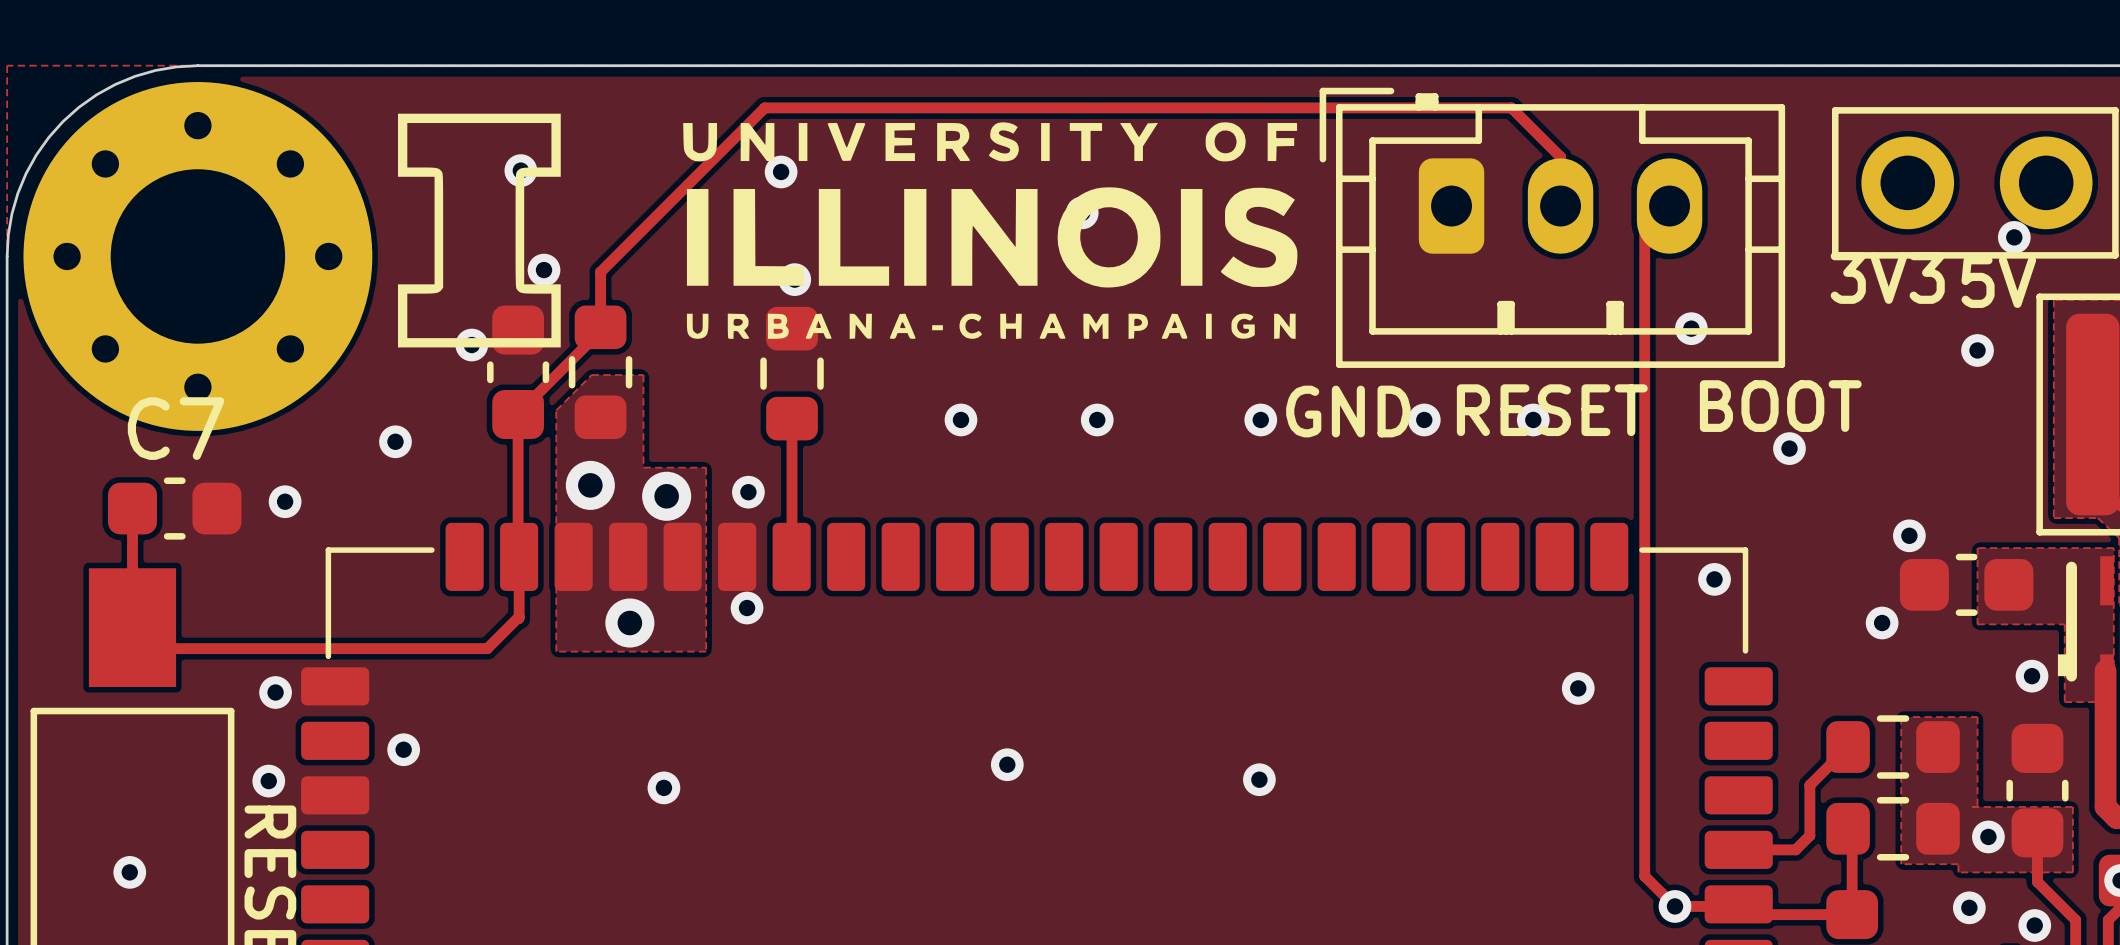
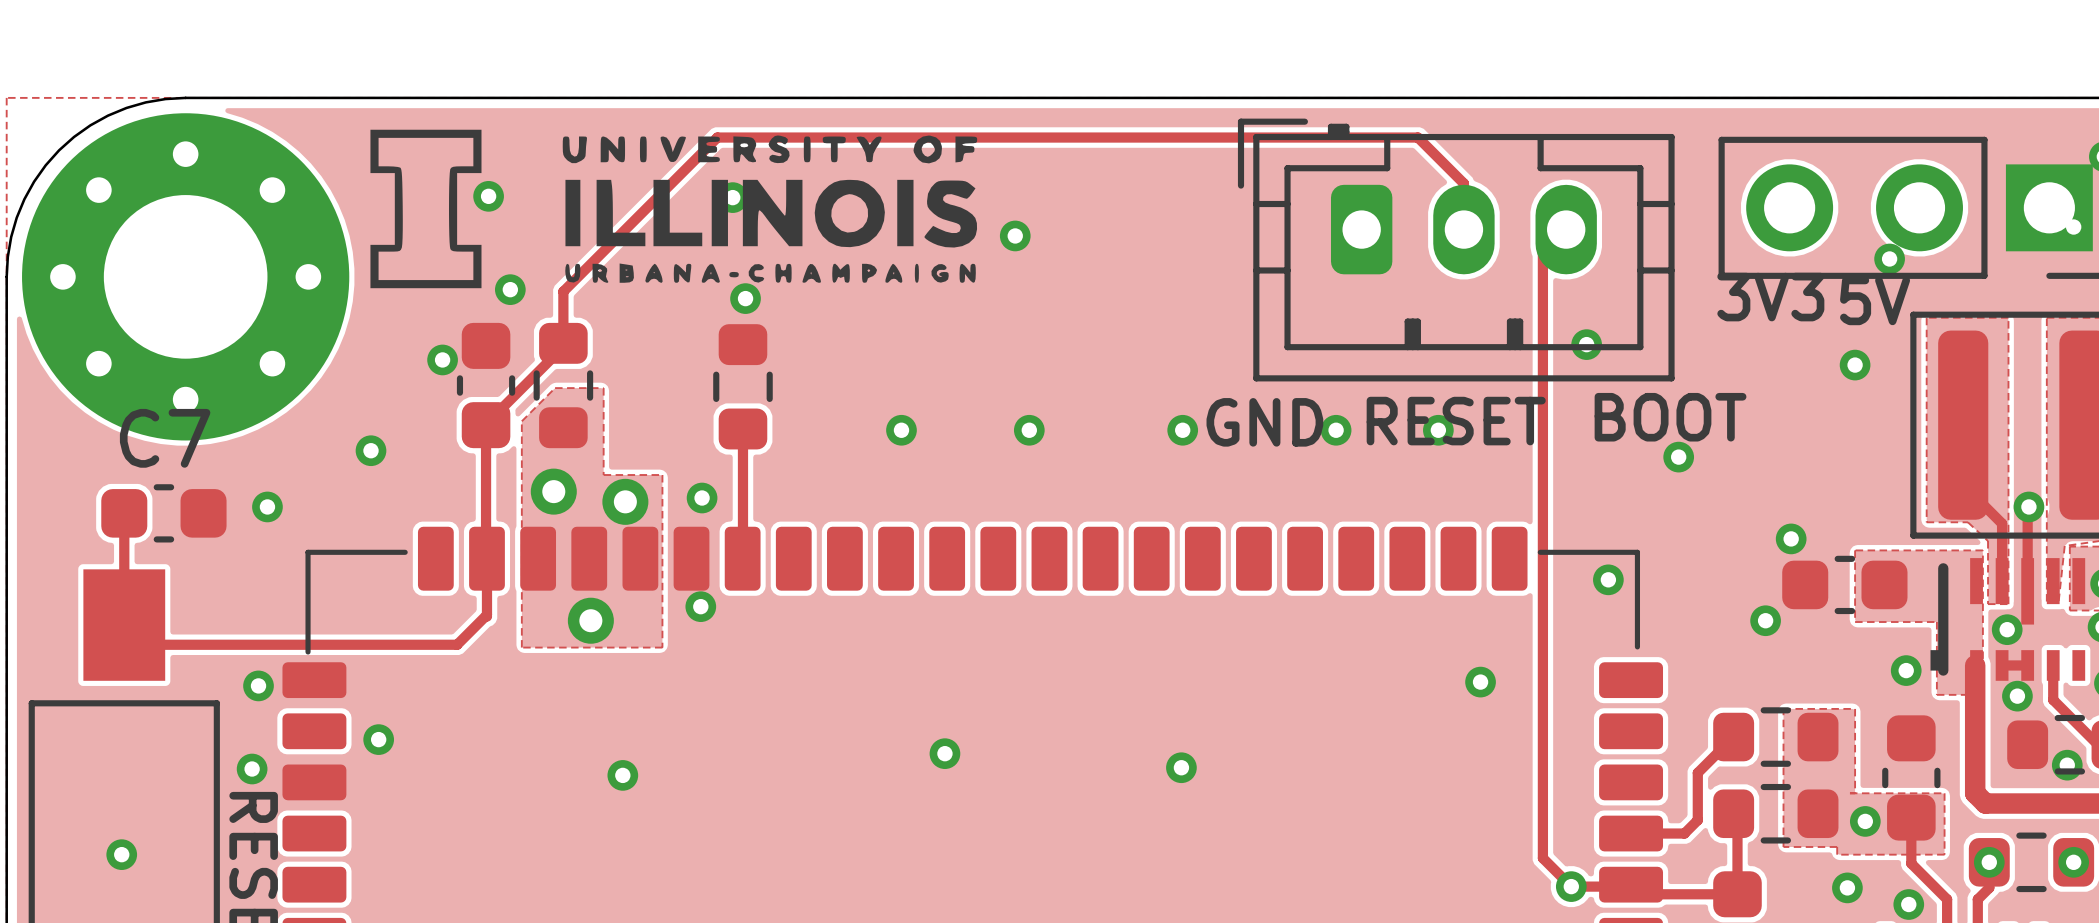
drawing: none -> [370, 129, 978, 289]
drawing: [397, 113, 1298, 348] -> none

